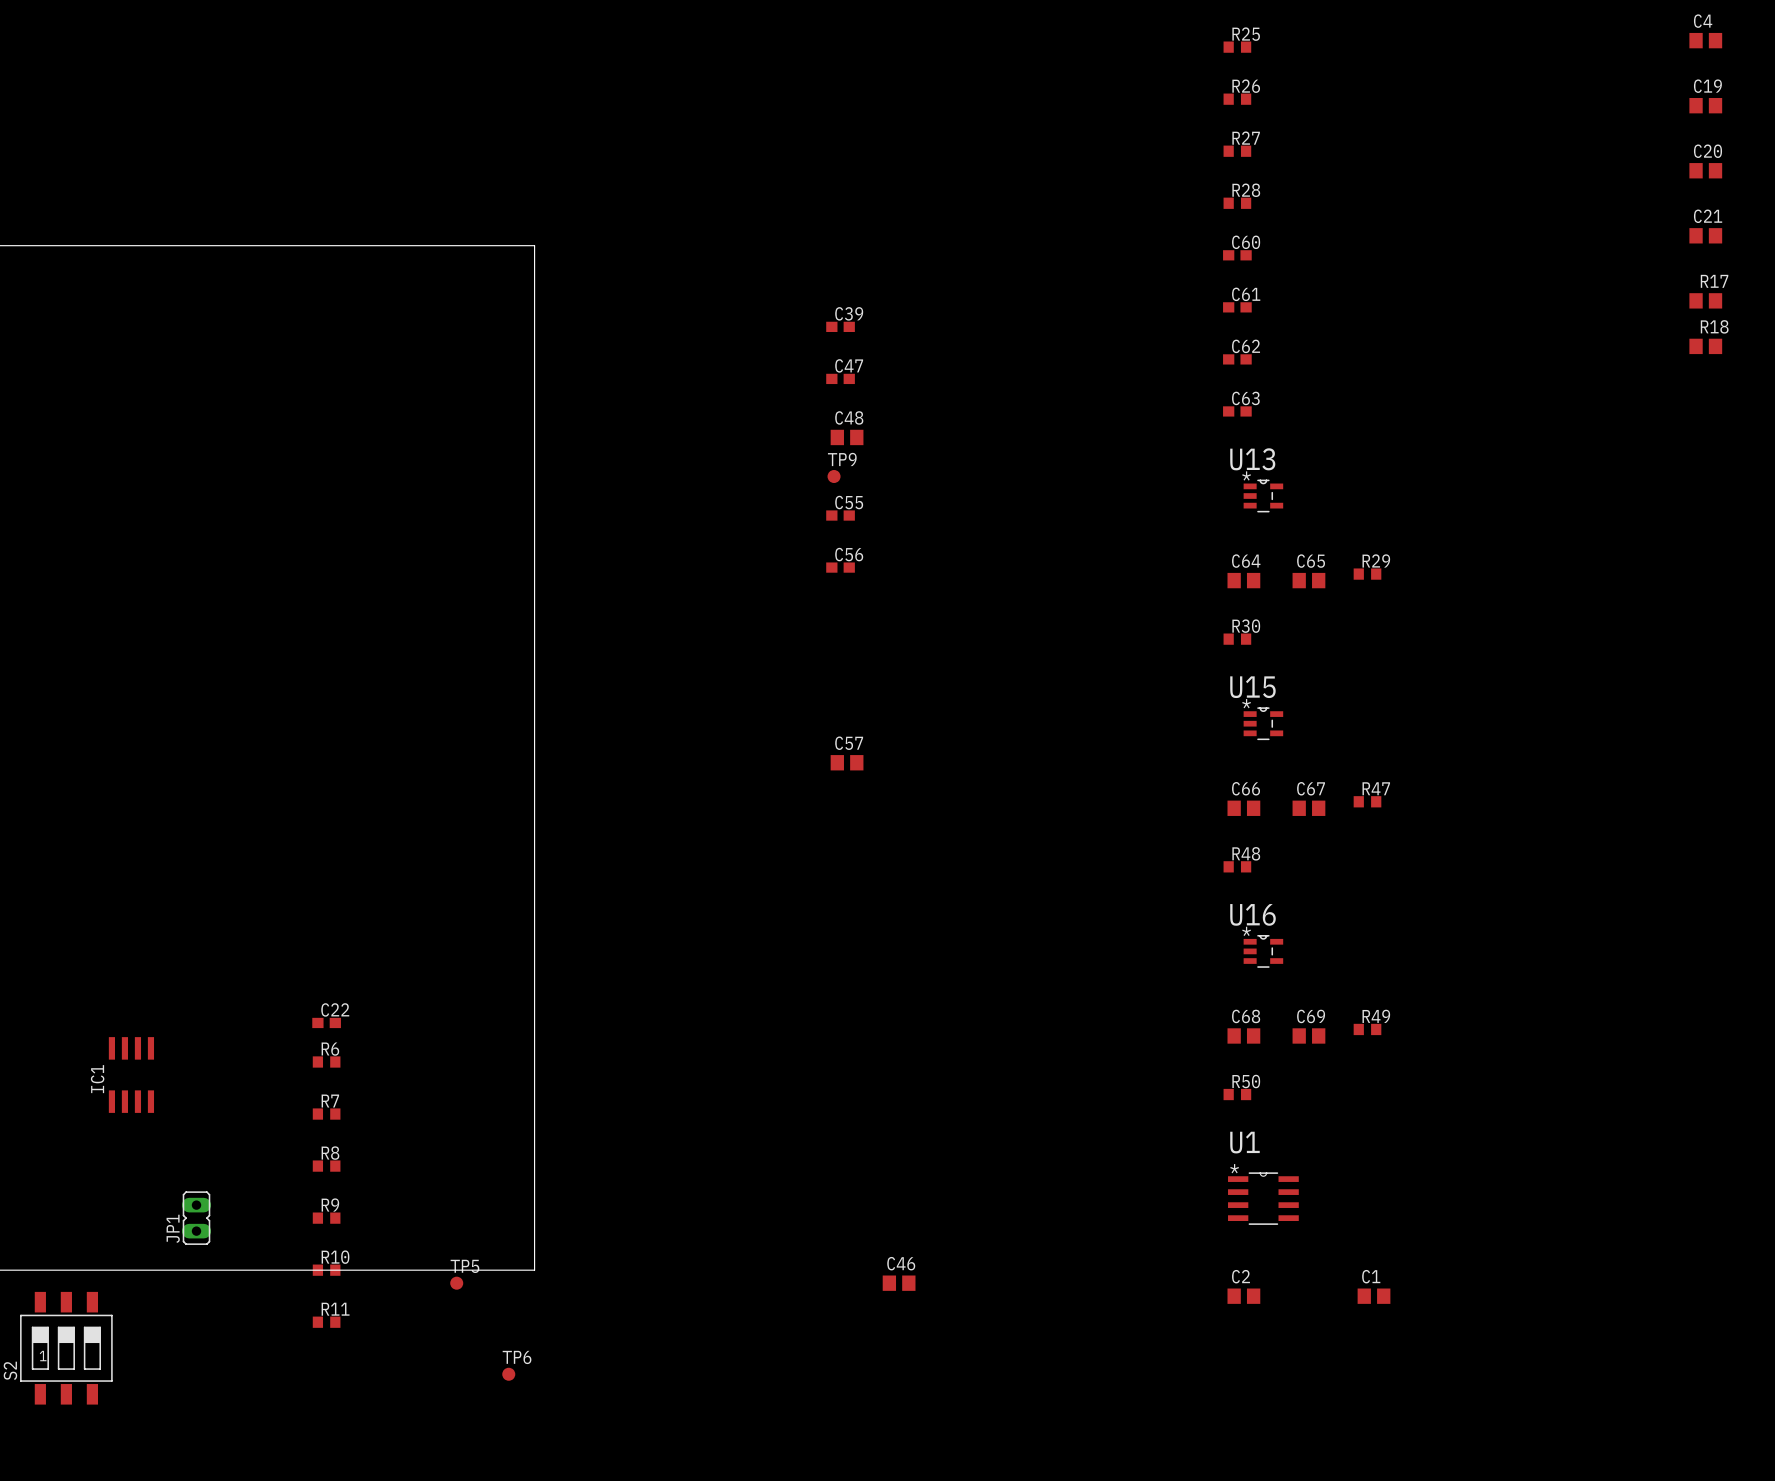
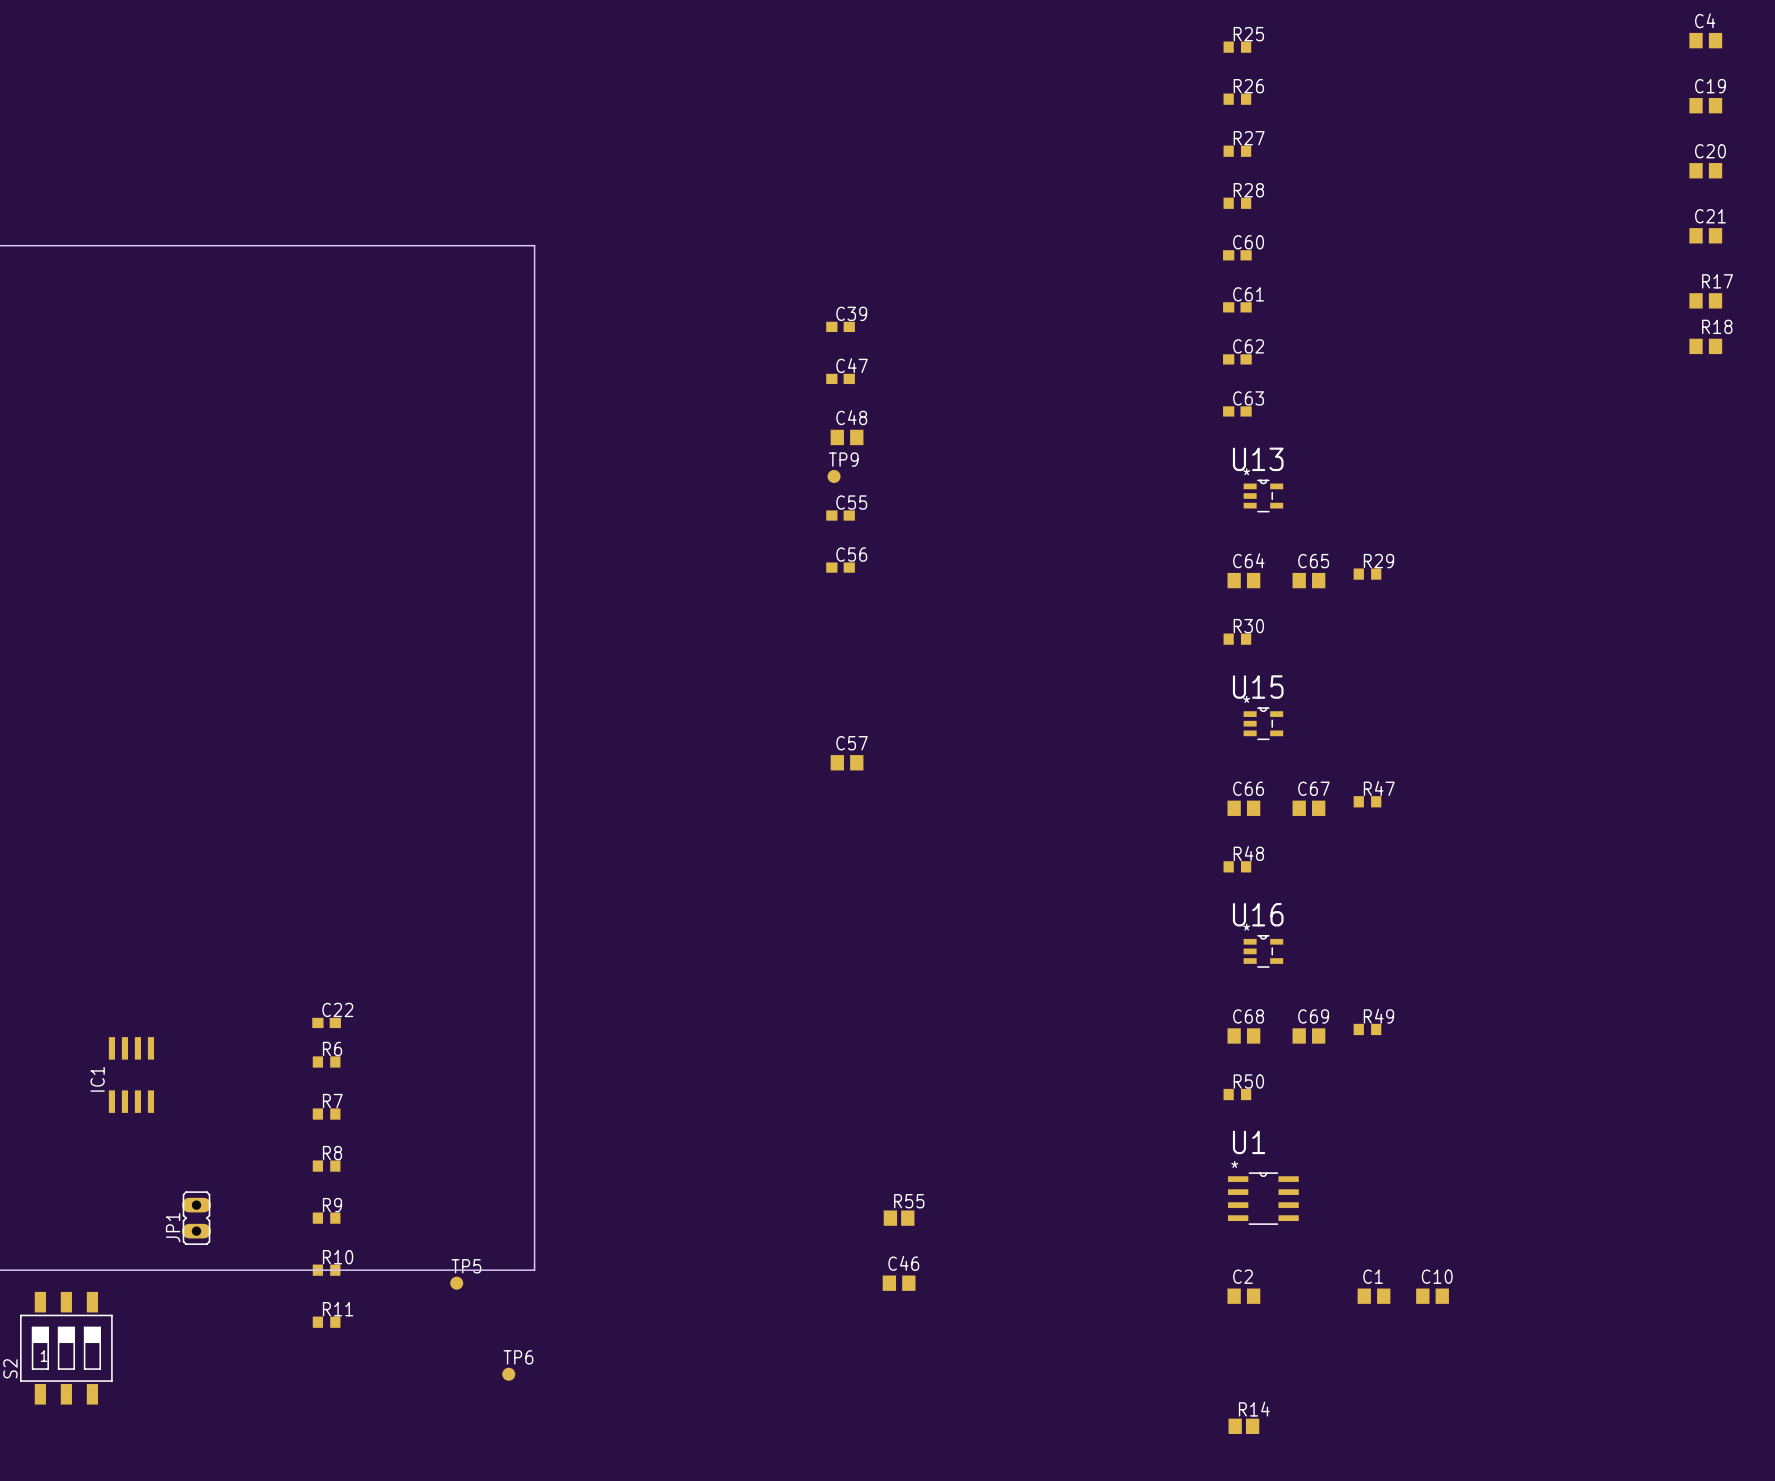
R55: none -> (899, 1218)
C10: none -> (1432, 1296)
R14: none -> (1243, 1426)

